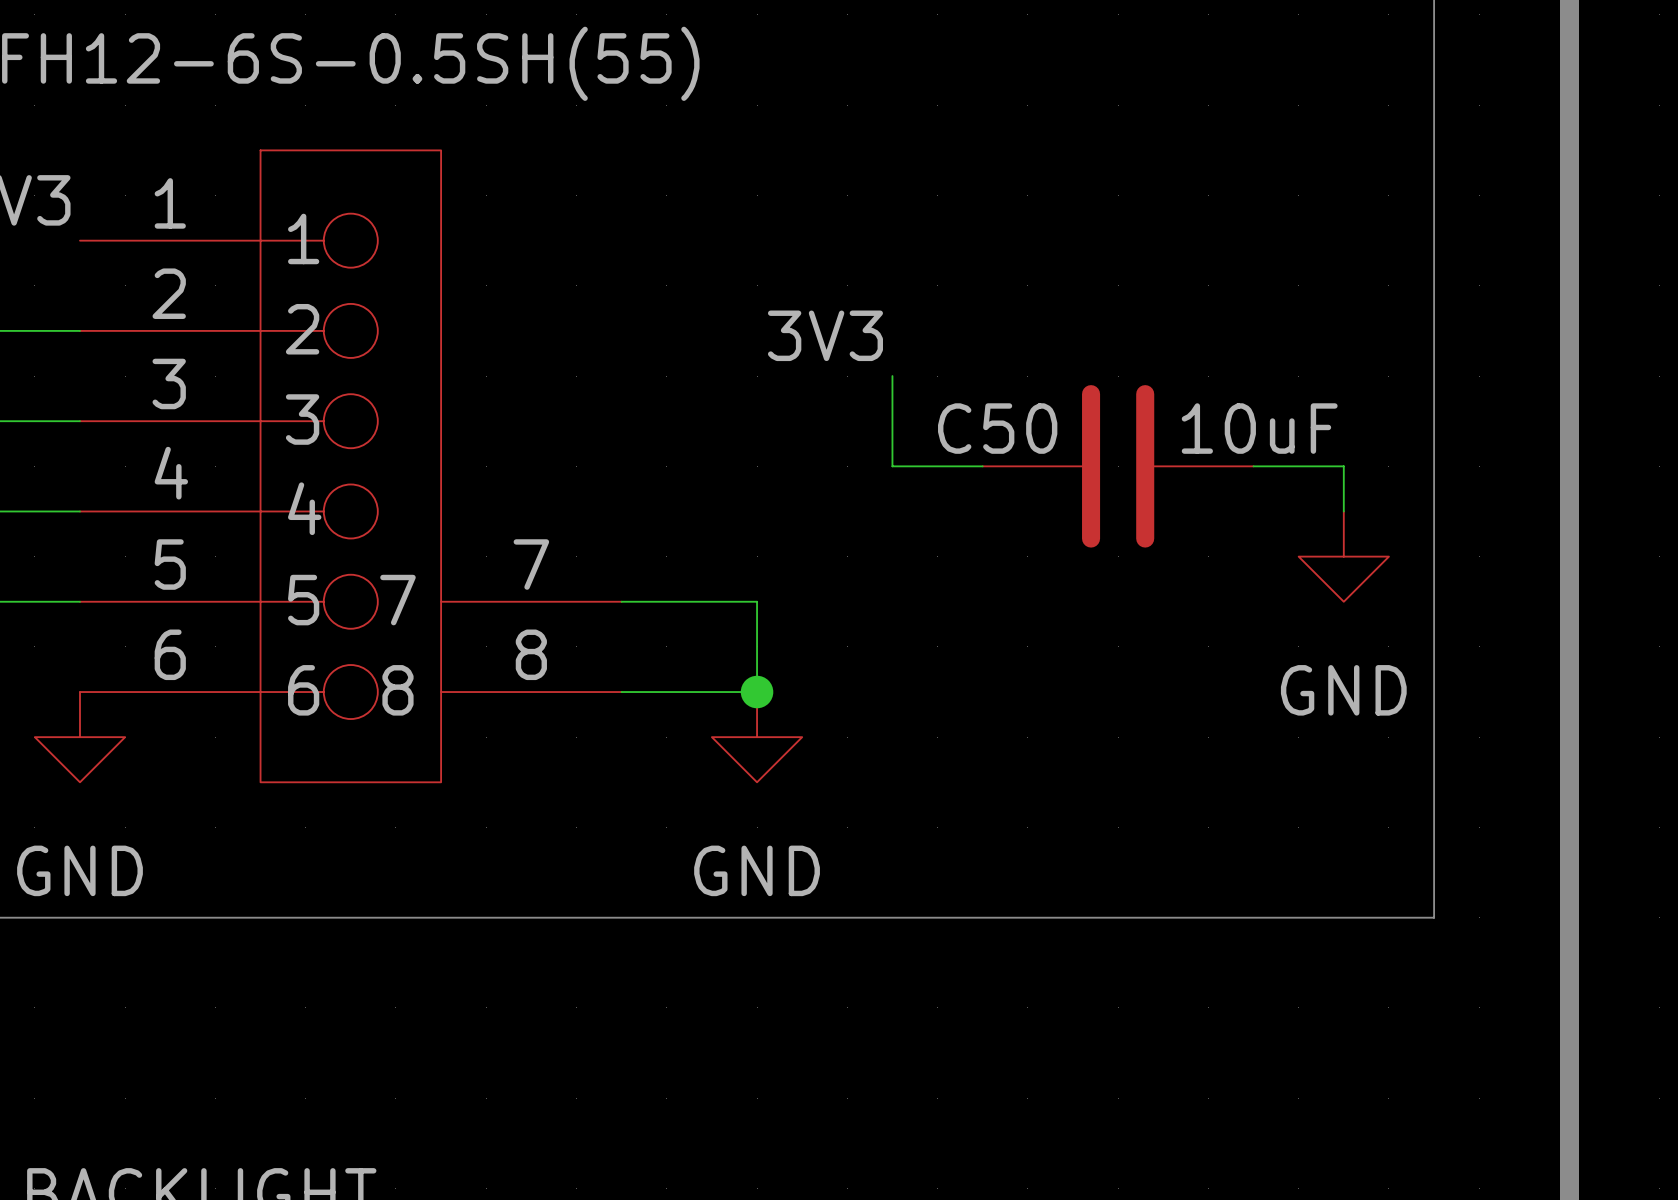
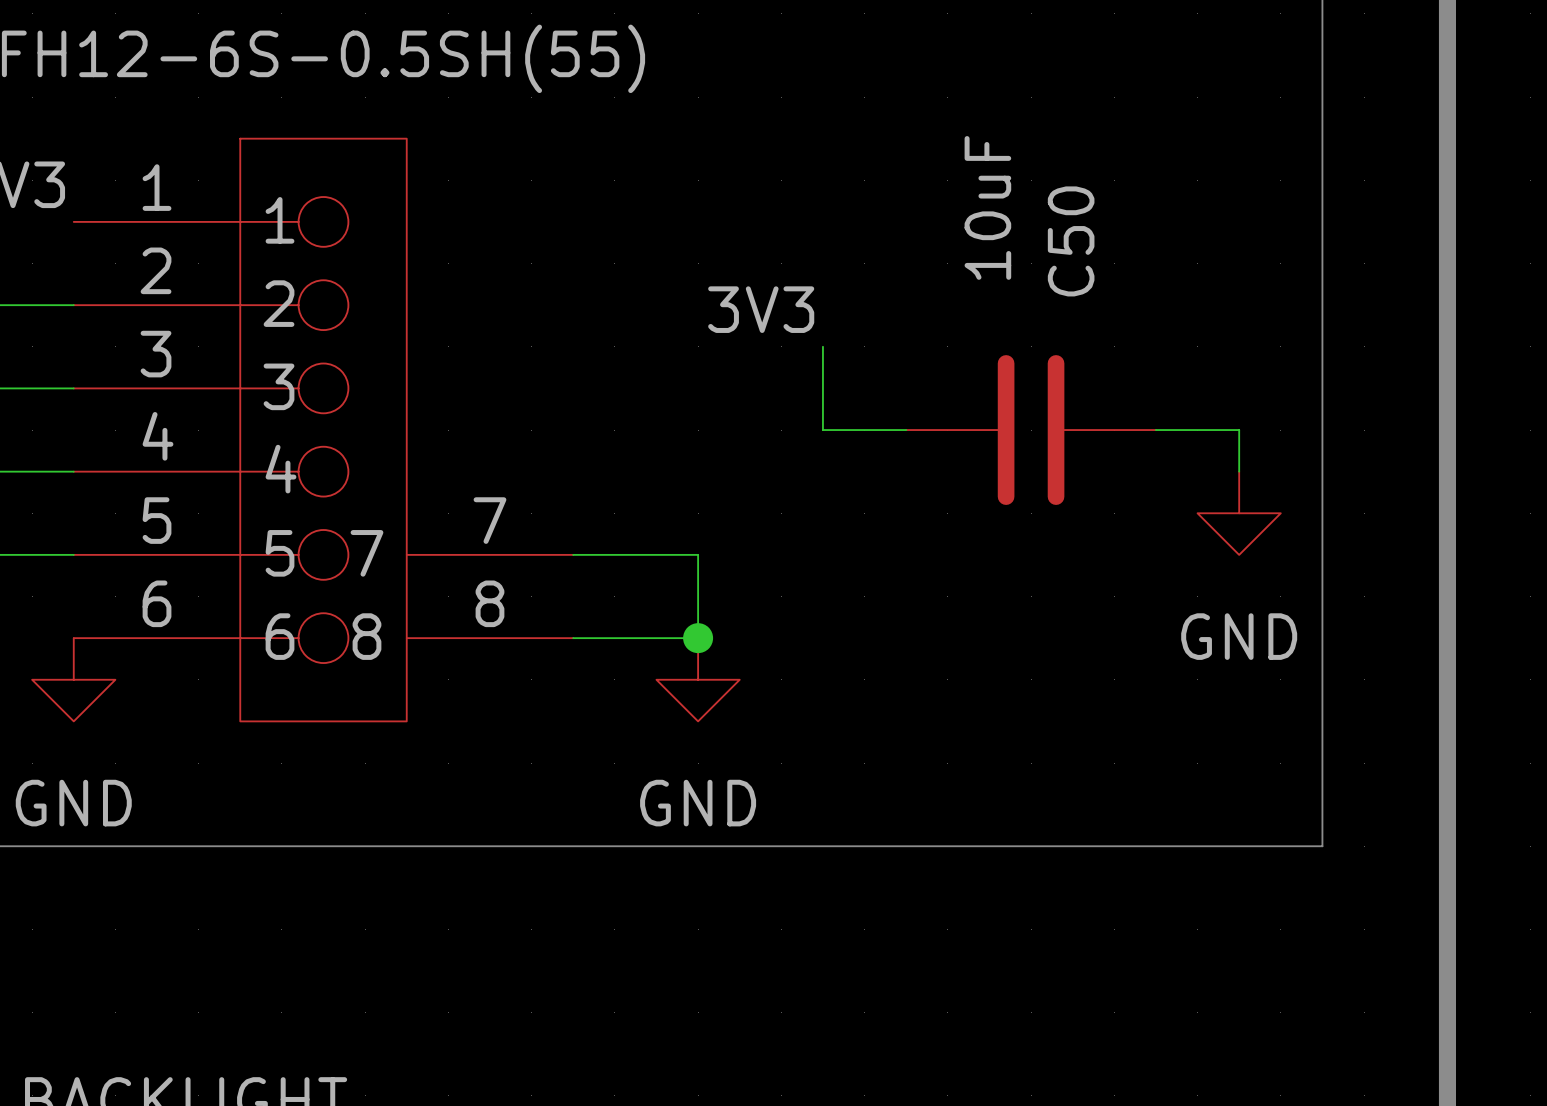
C50 name rotation: 0° (997, 428) -> 90° counterclockwise (1071, 241)
C50 name position: C50 (997, 428) -> C50 (1071, 241)
C50 value rotation: 0° (1259, 428) -> 90° counterclockwise (987, 207)
C50 value position: 10uF (1259, 428) -> 10uF (987, 207)

